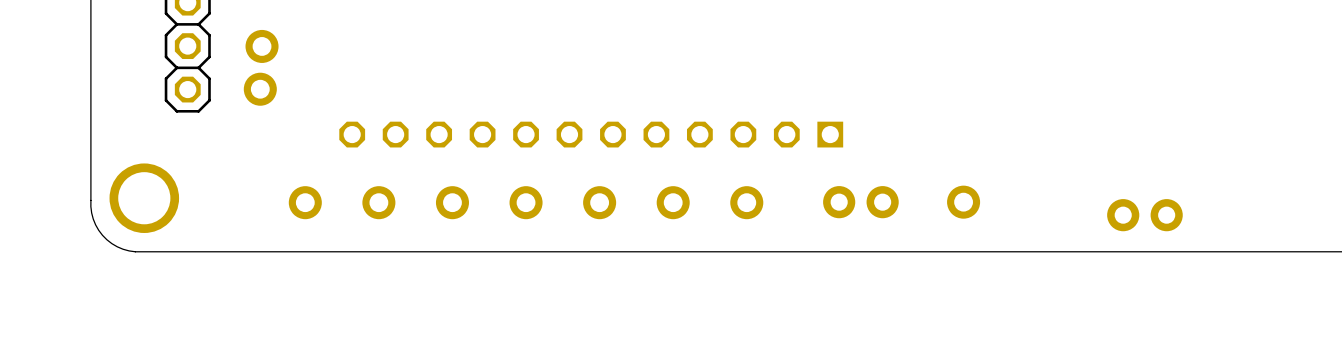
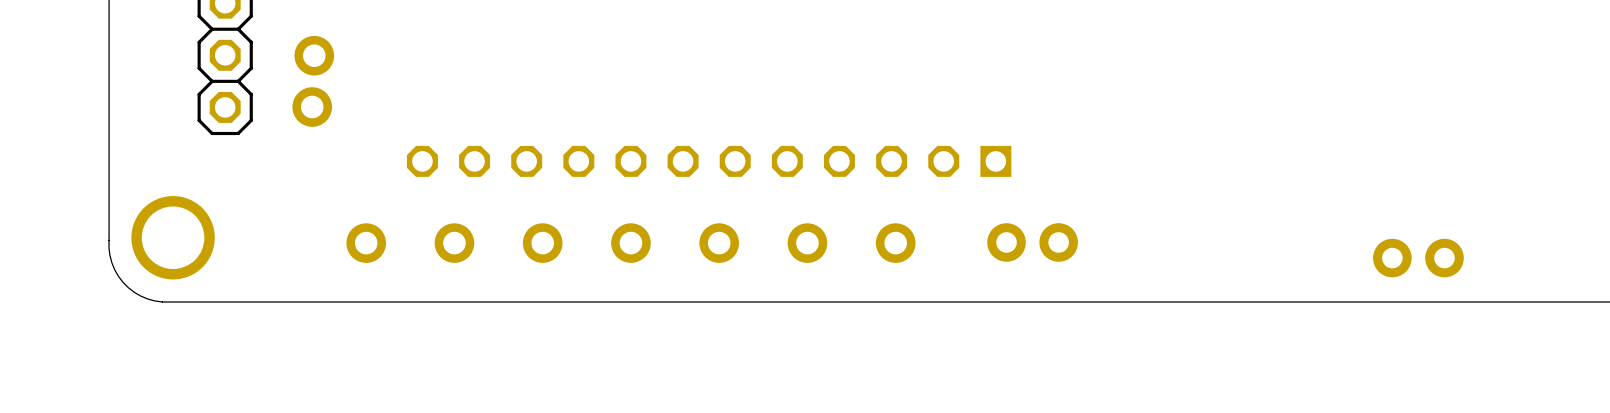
part: (963, 202) -> none
part position: (1144, 215) -> (1418, 258)

